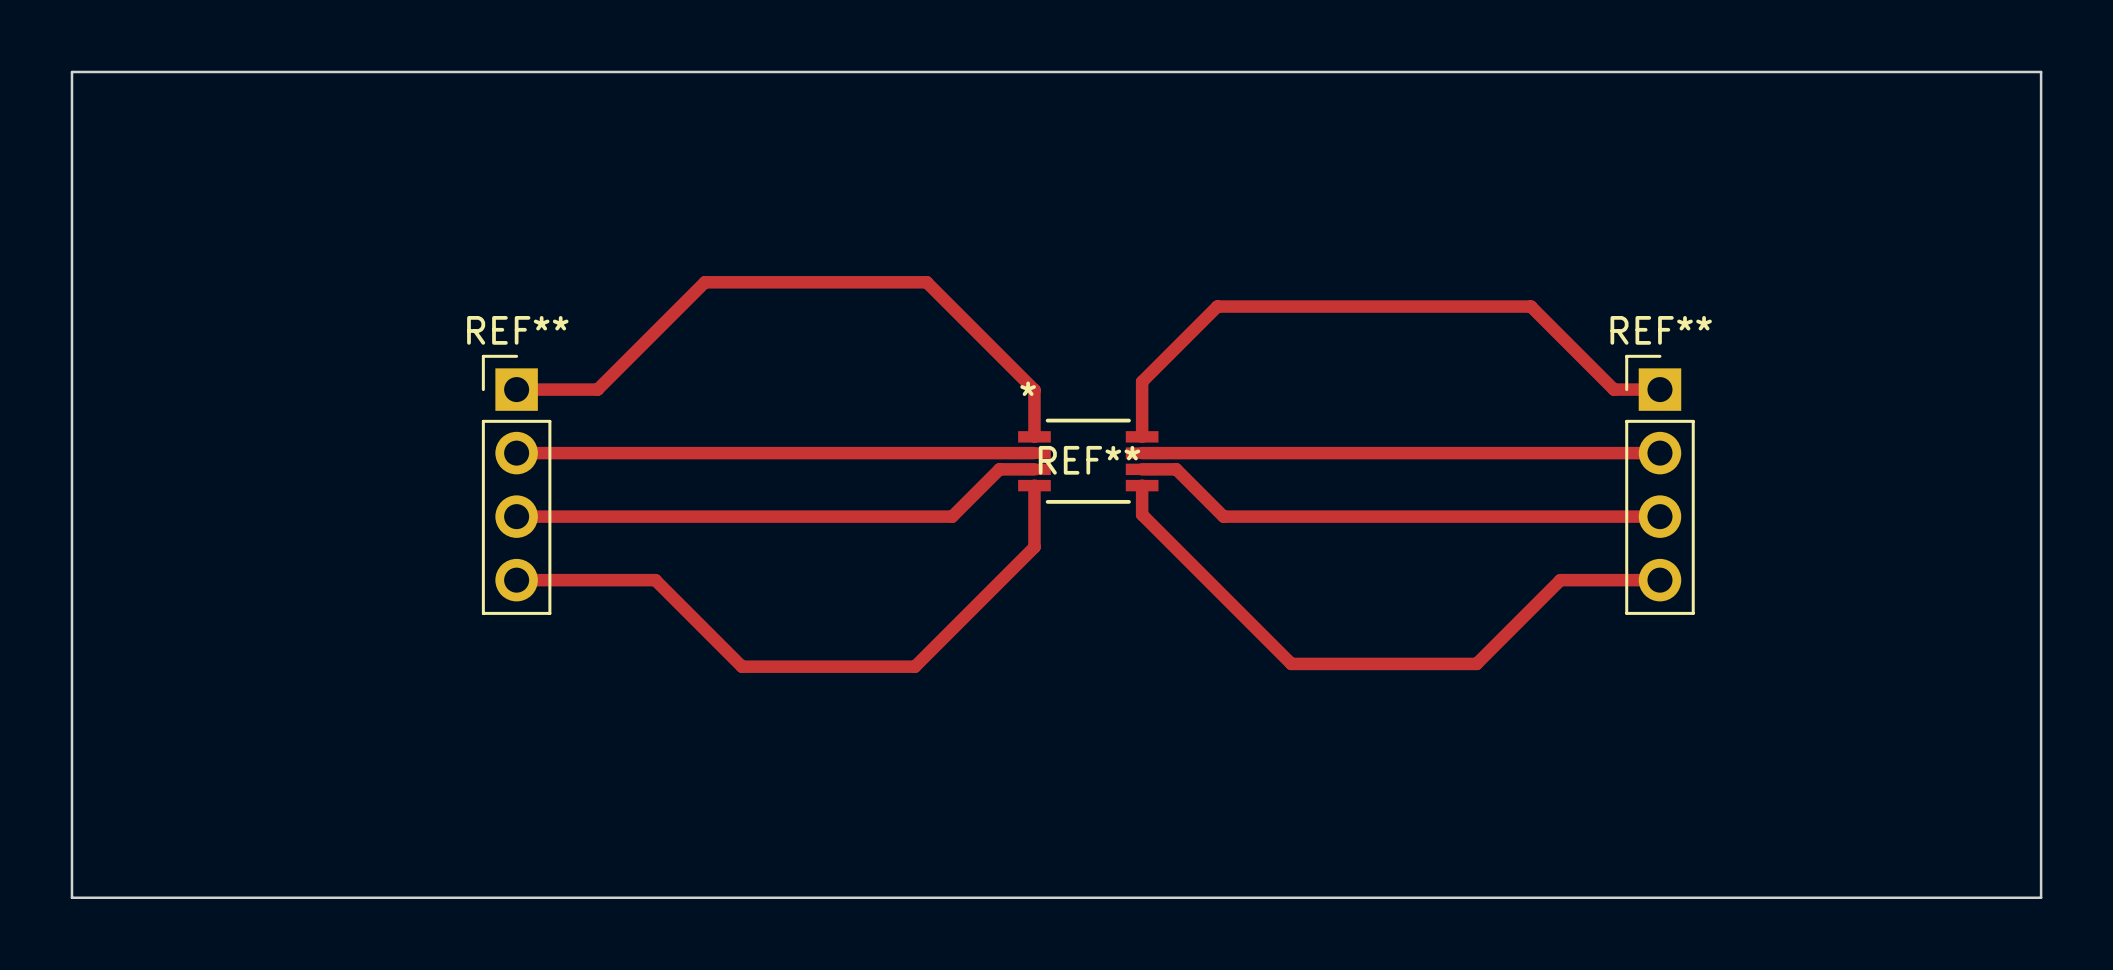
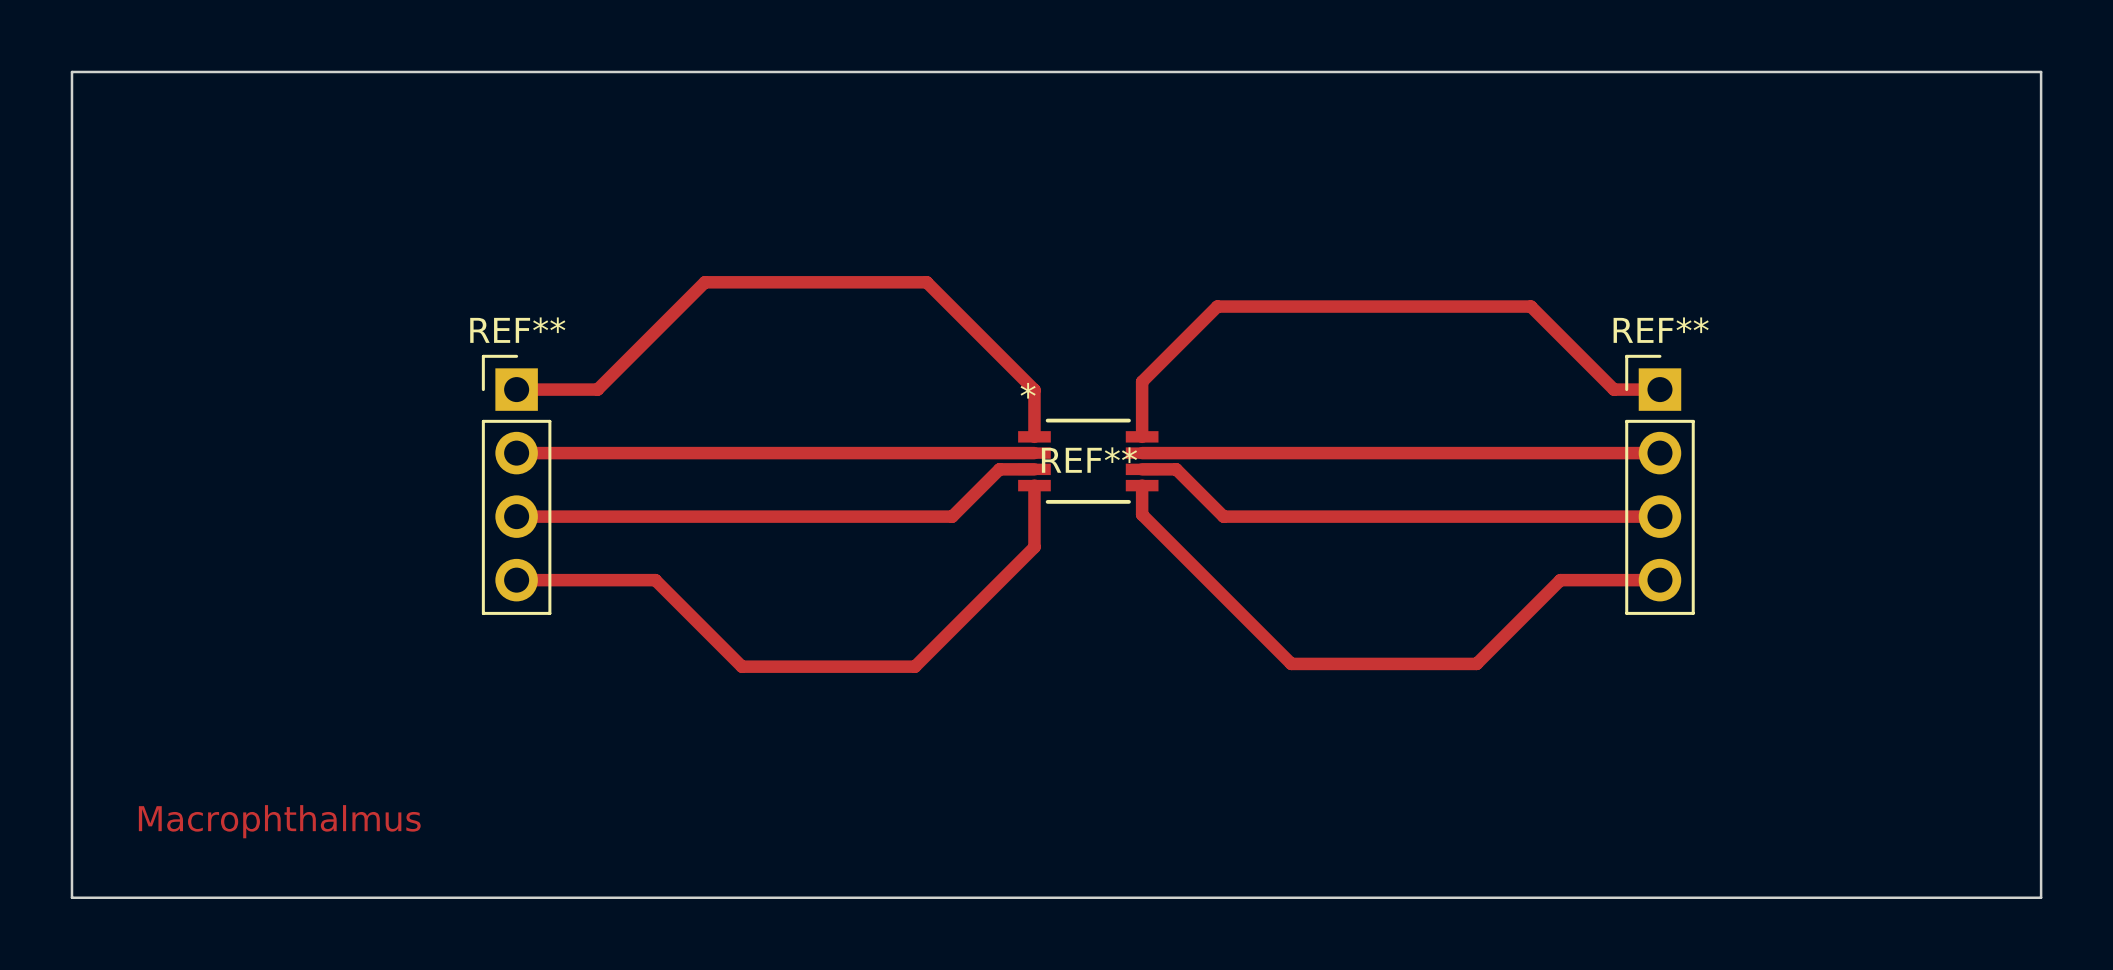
text: none -> Macrophthalmus (279, 821)

